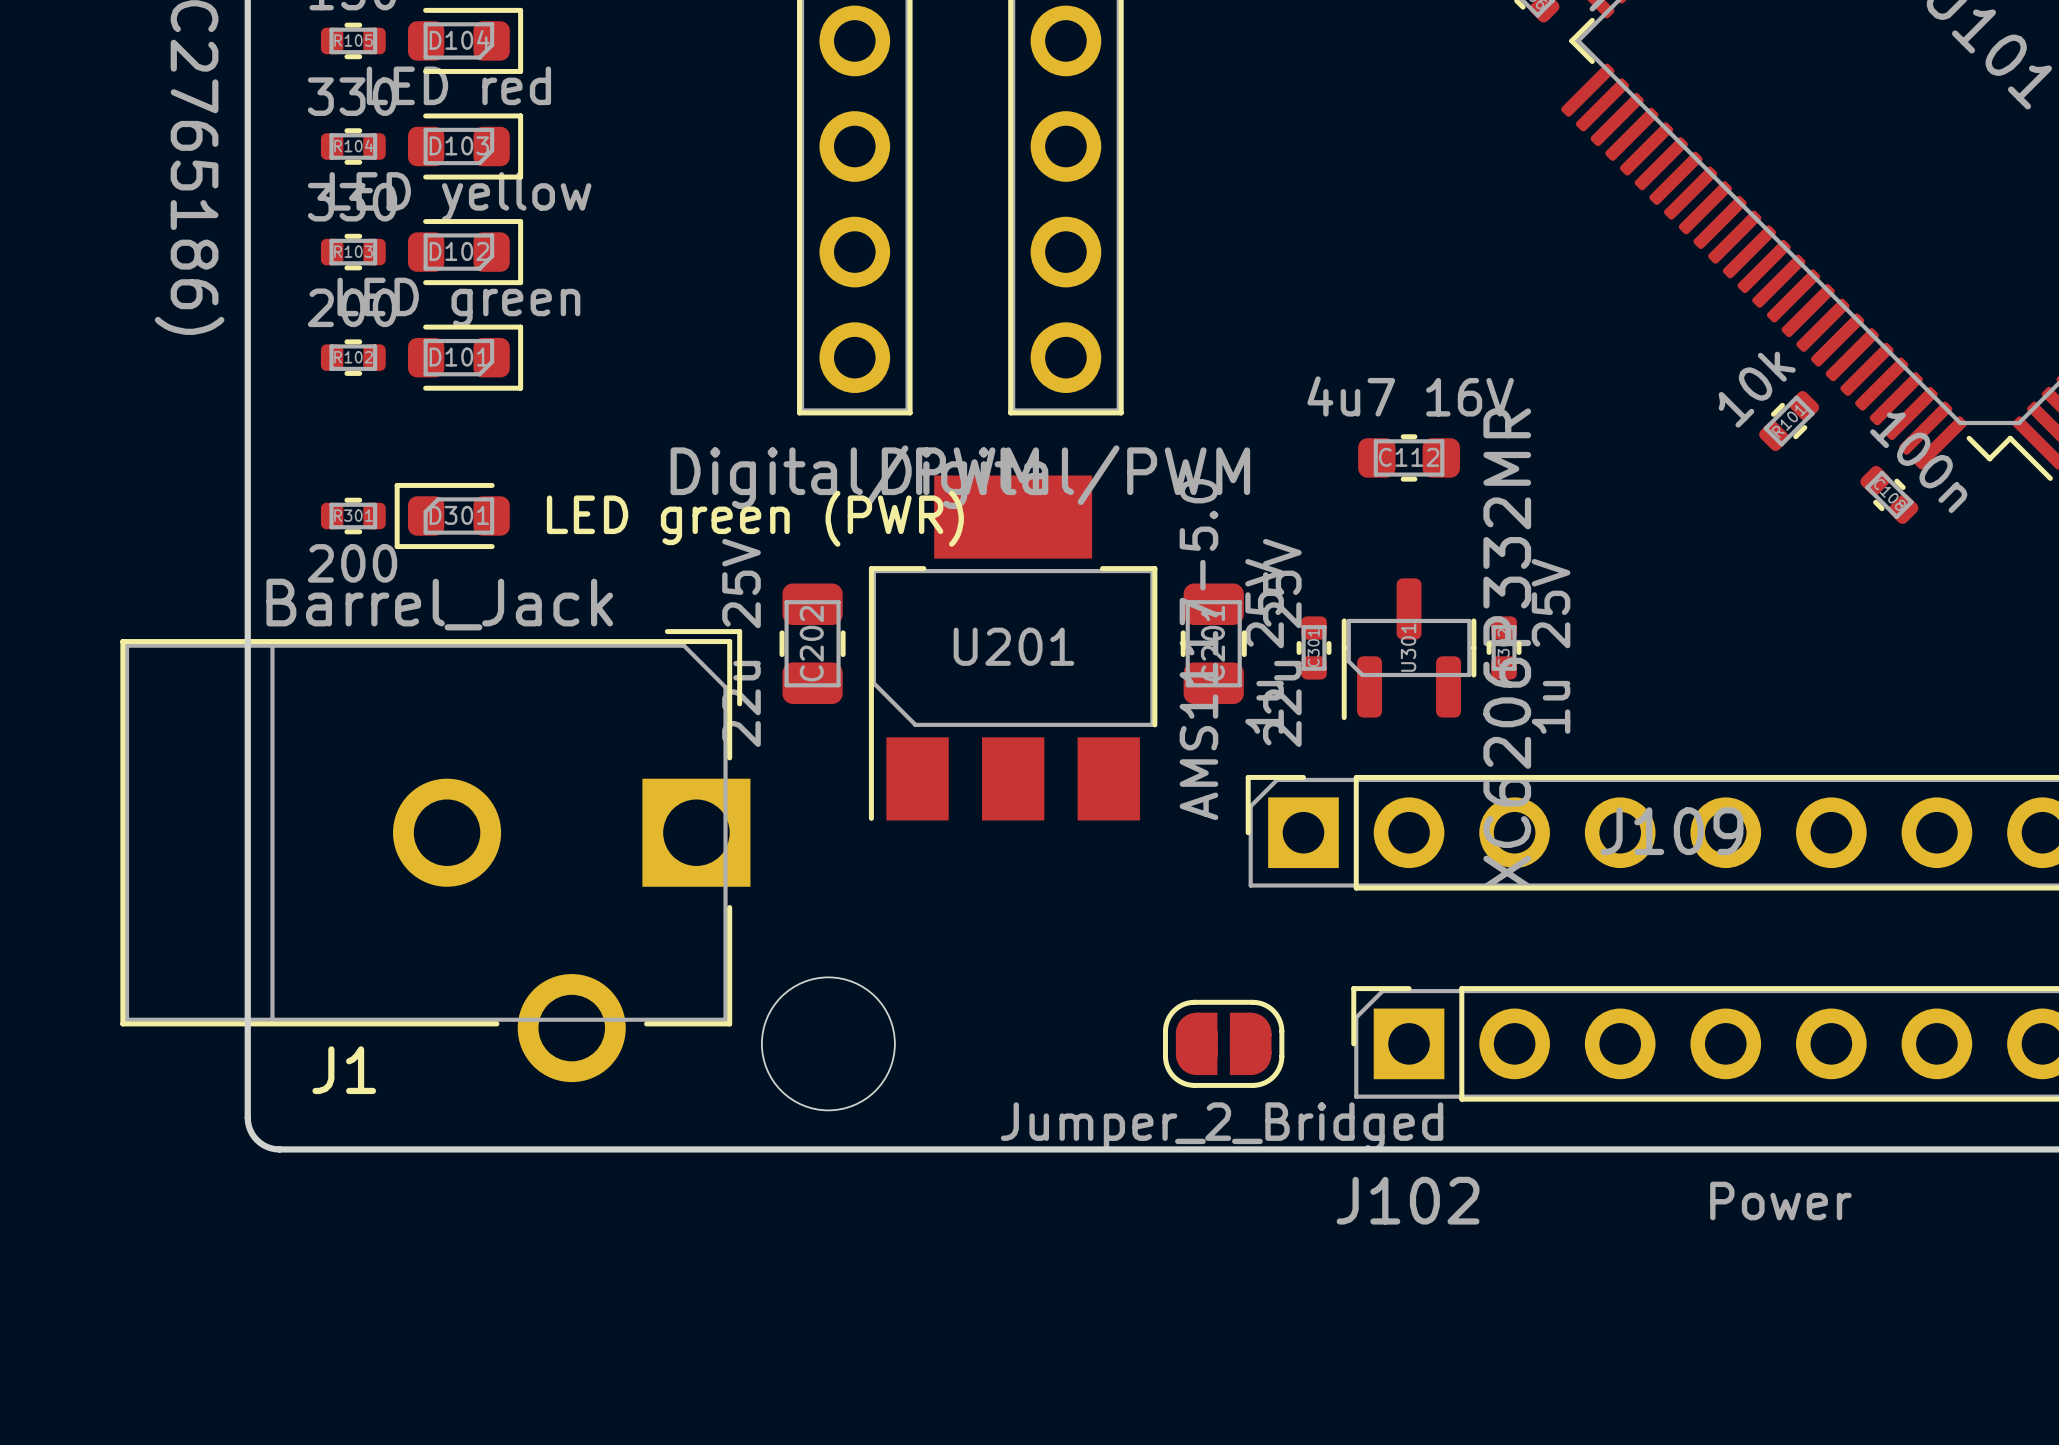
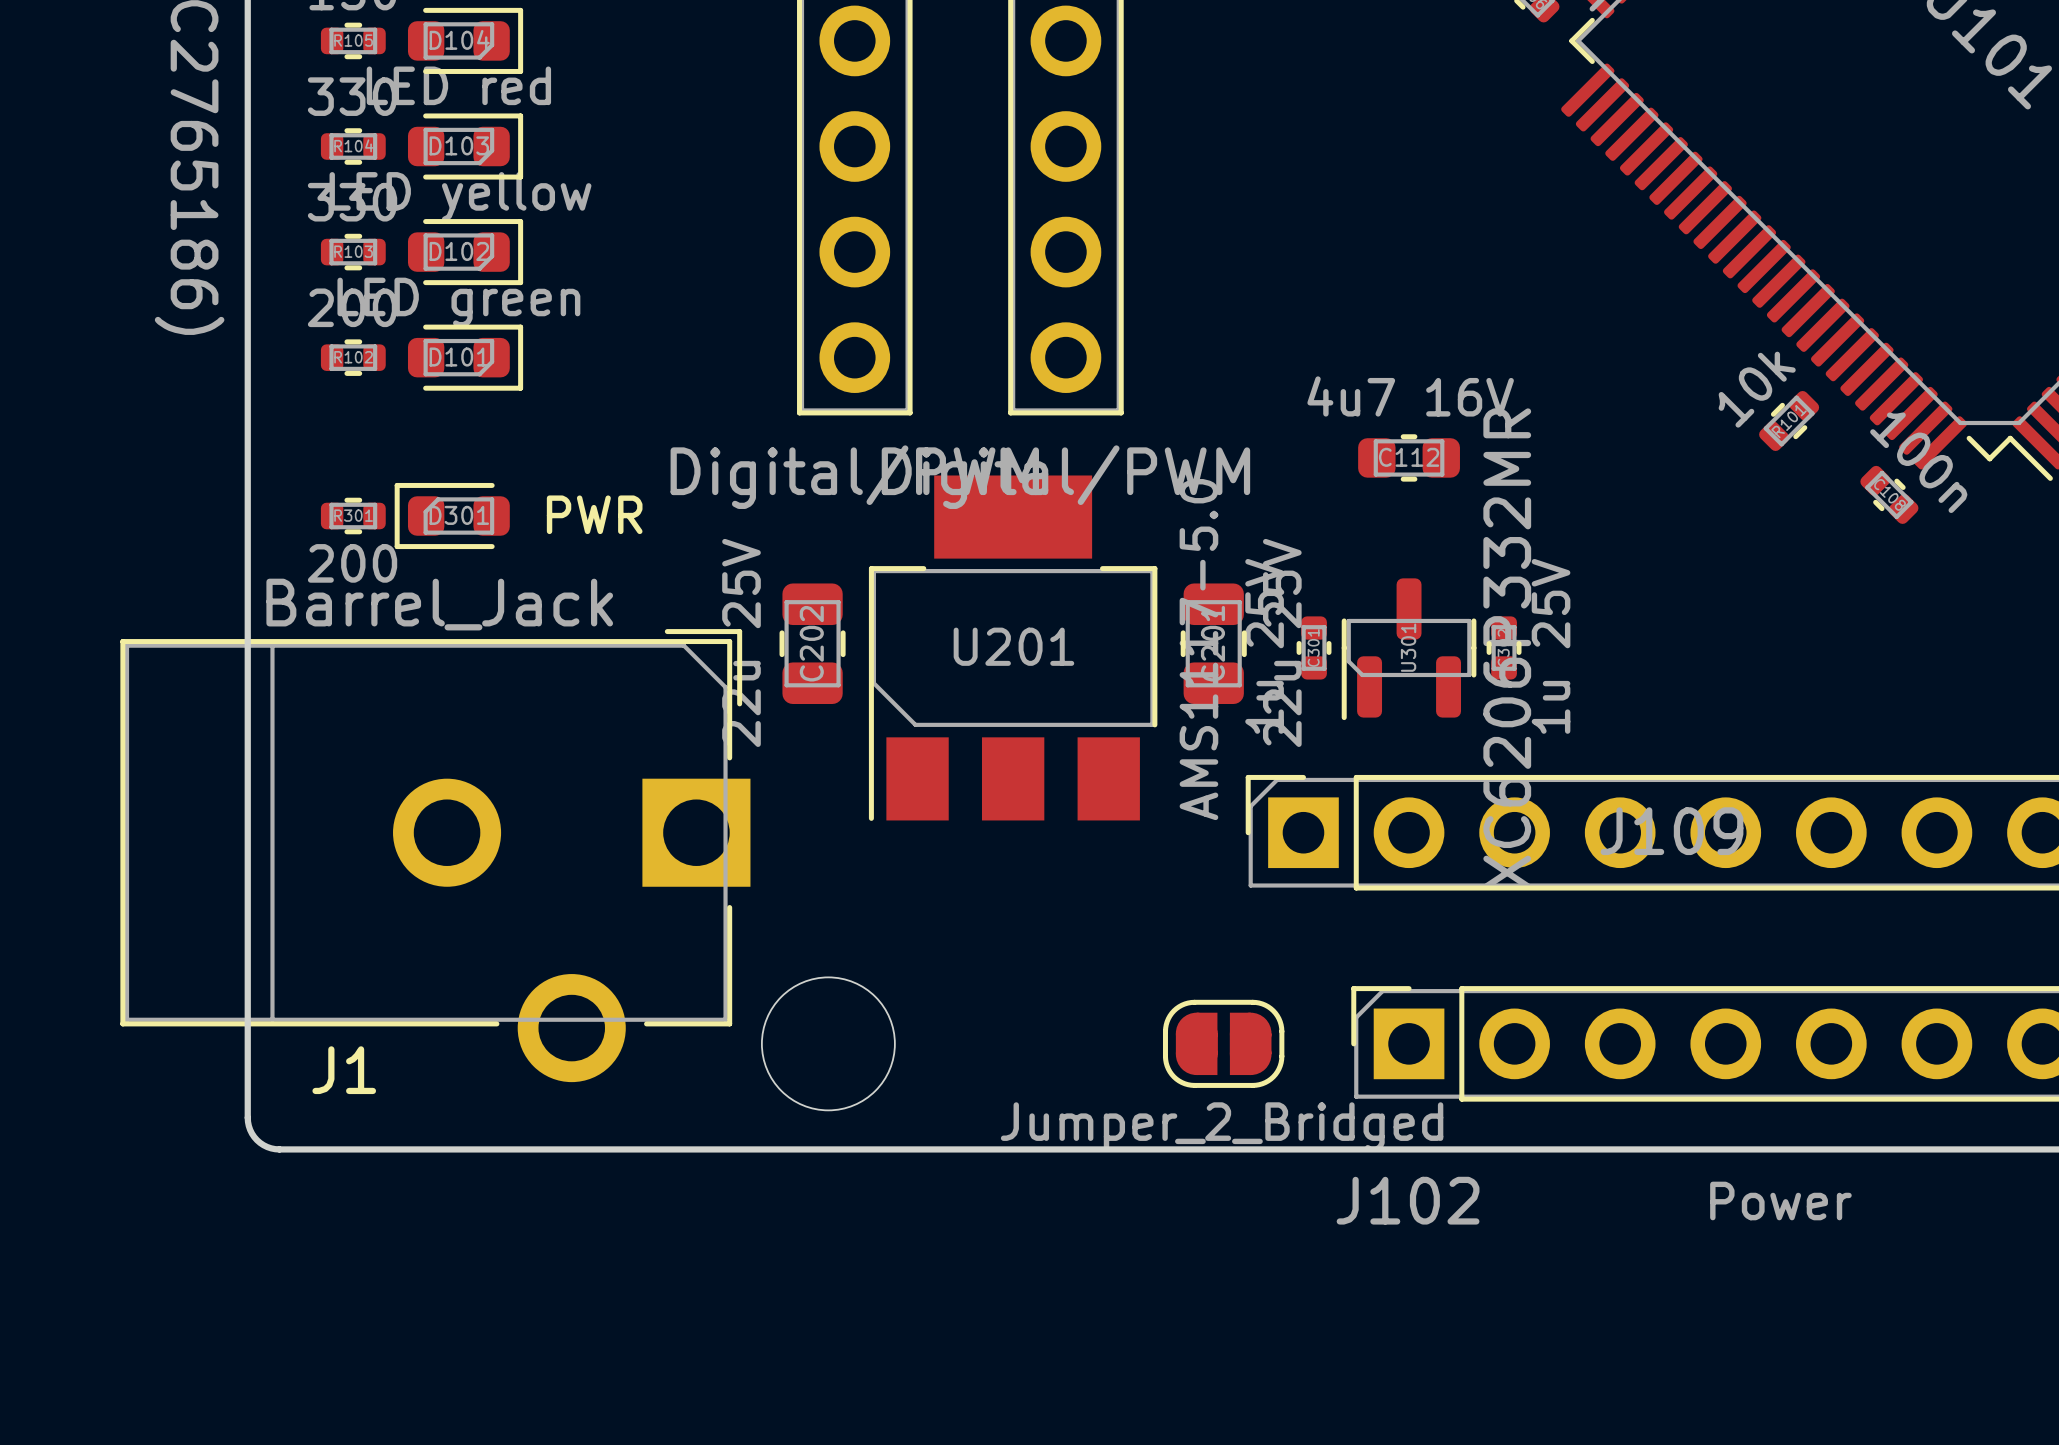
D301 value: LED green (PWR) (755, 518) -> PWR (594, 514)

